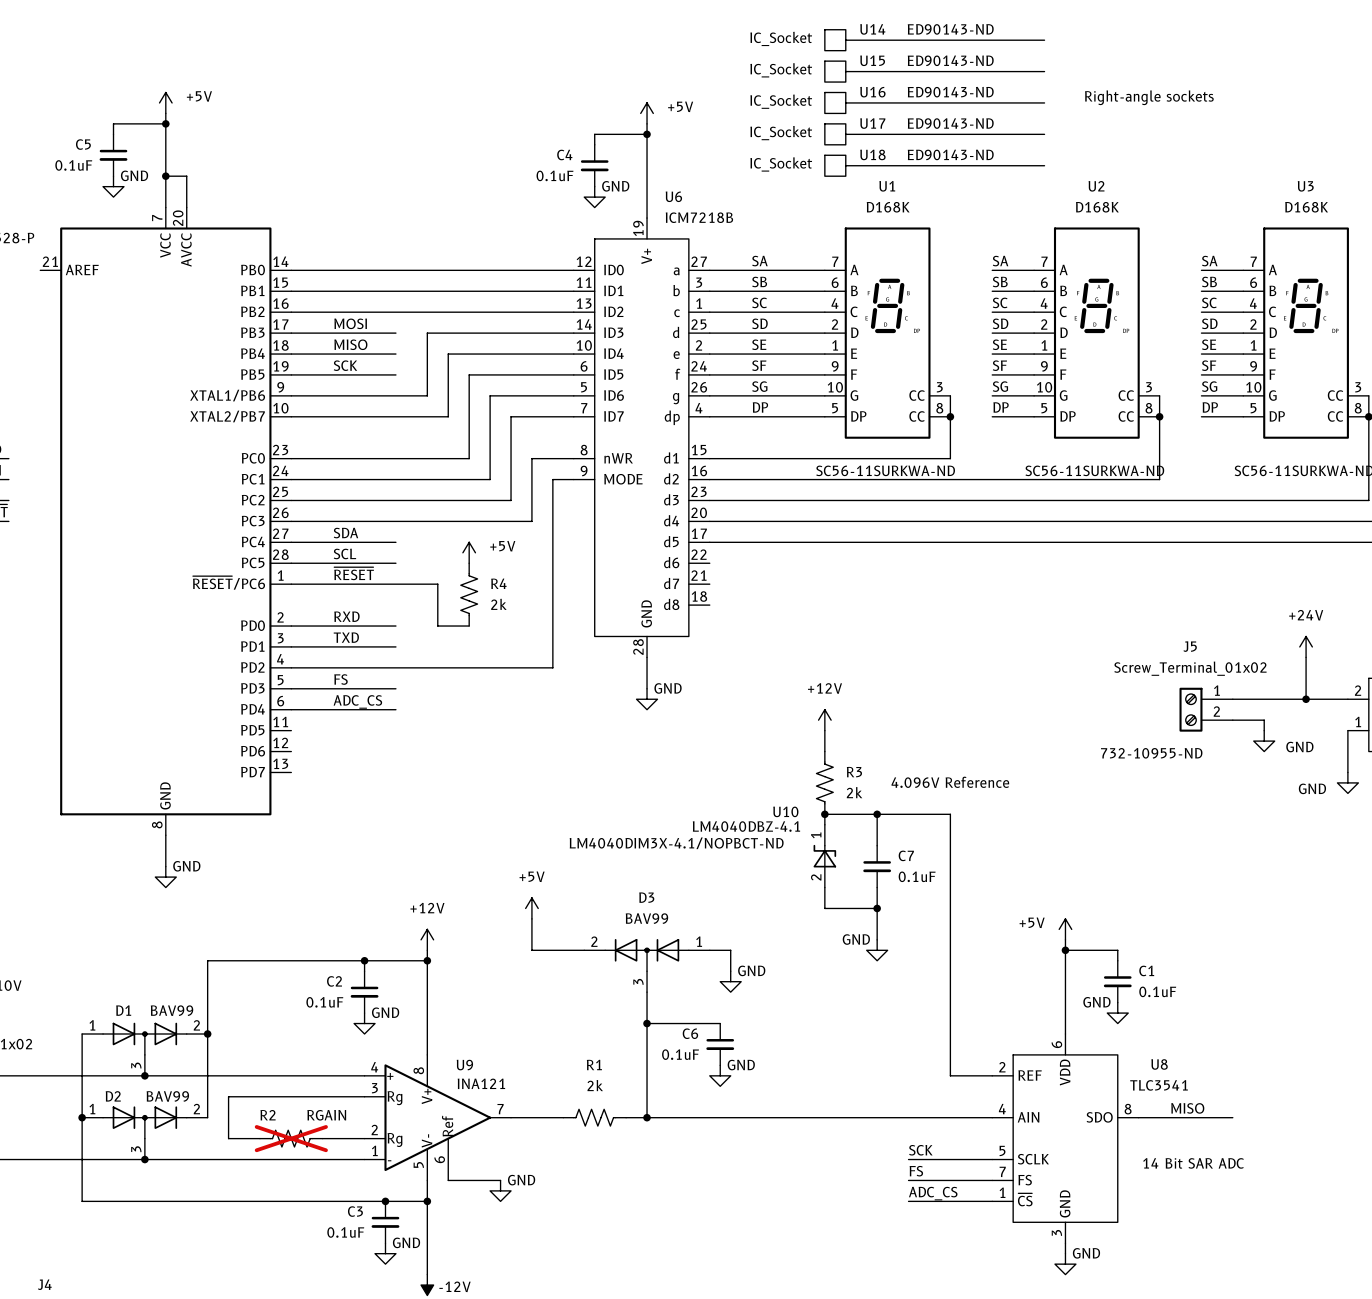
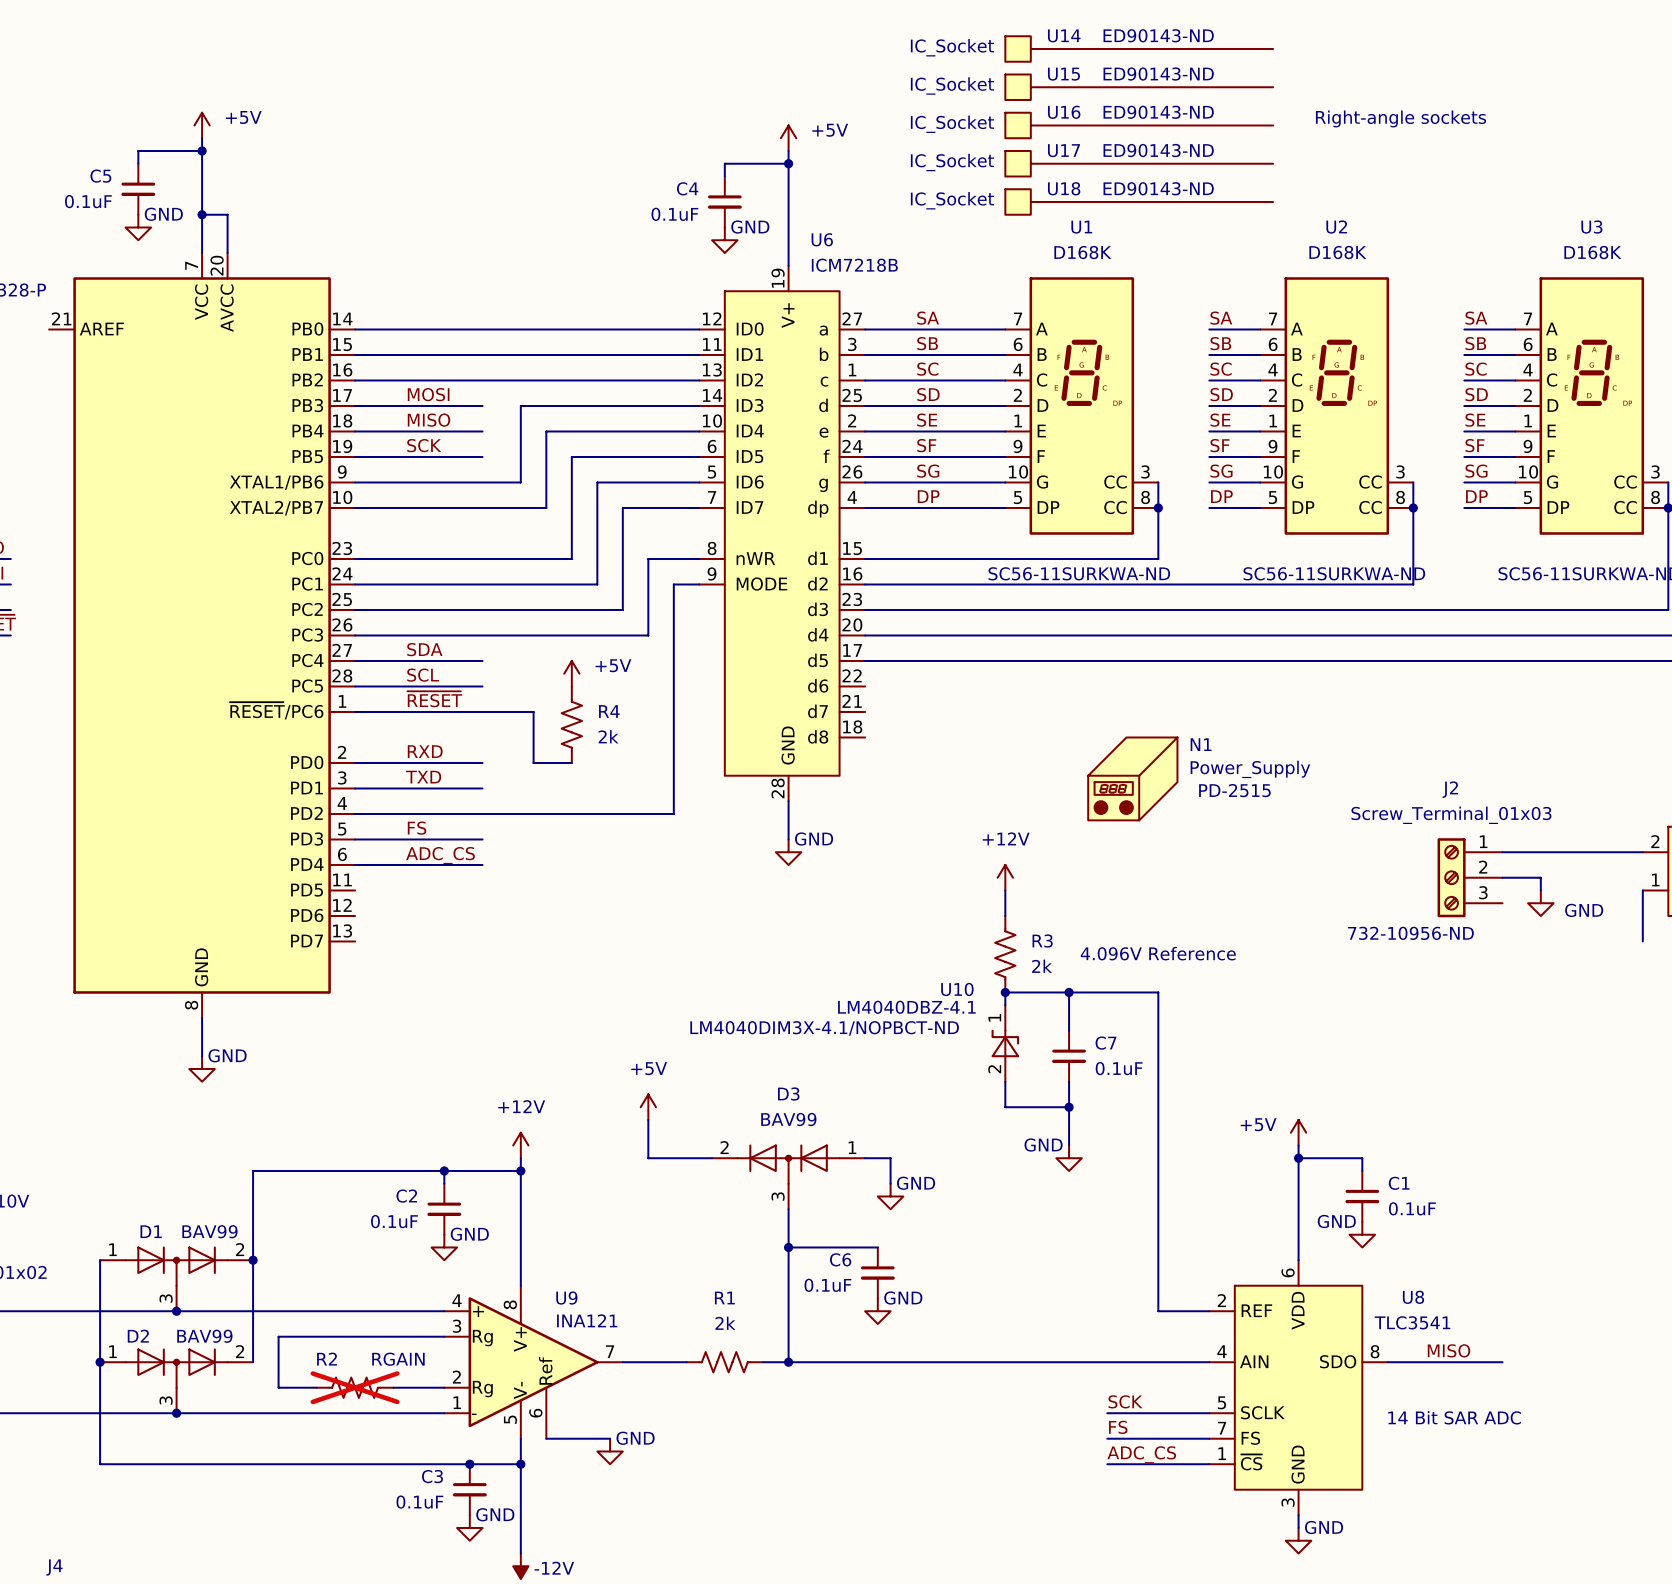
N1: none -> Power_Supply (1132, 778)
power symbol: +24V (1306, 646) -> none
wire: (1306, 657) (1306, 699) -> none
junction: (1306, 699) -> none
J5: Screw_Terminal_01x02 (1206, 709) -> none
J2: none -> Screw_Terminal_01x03 (1470, 877)
power symbol: GND (1347, 782) -> none

